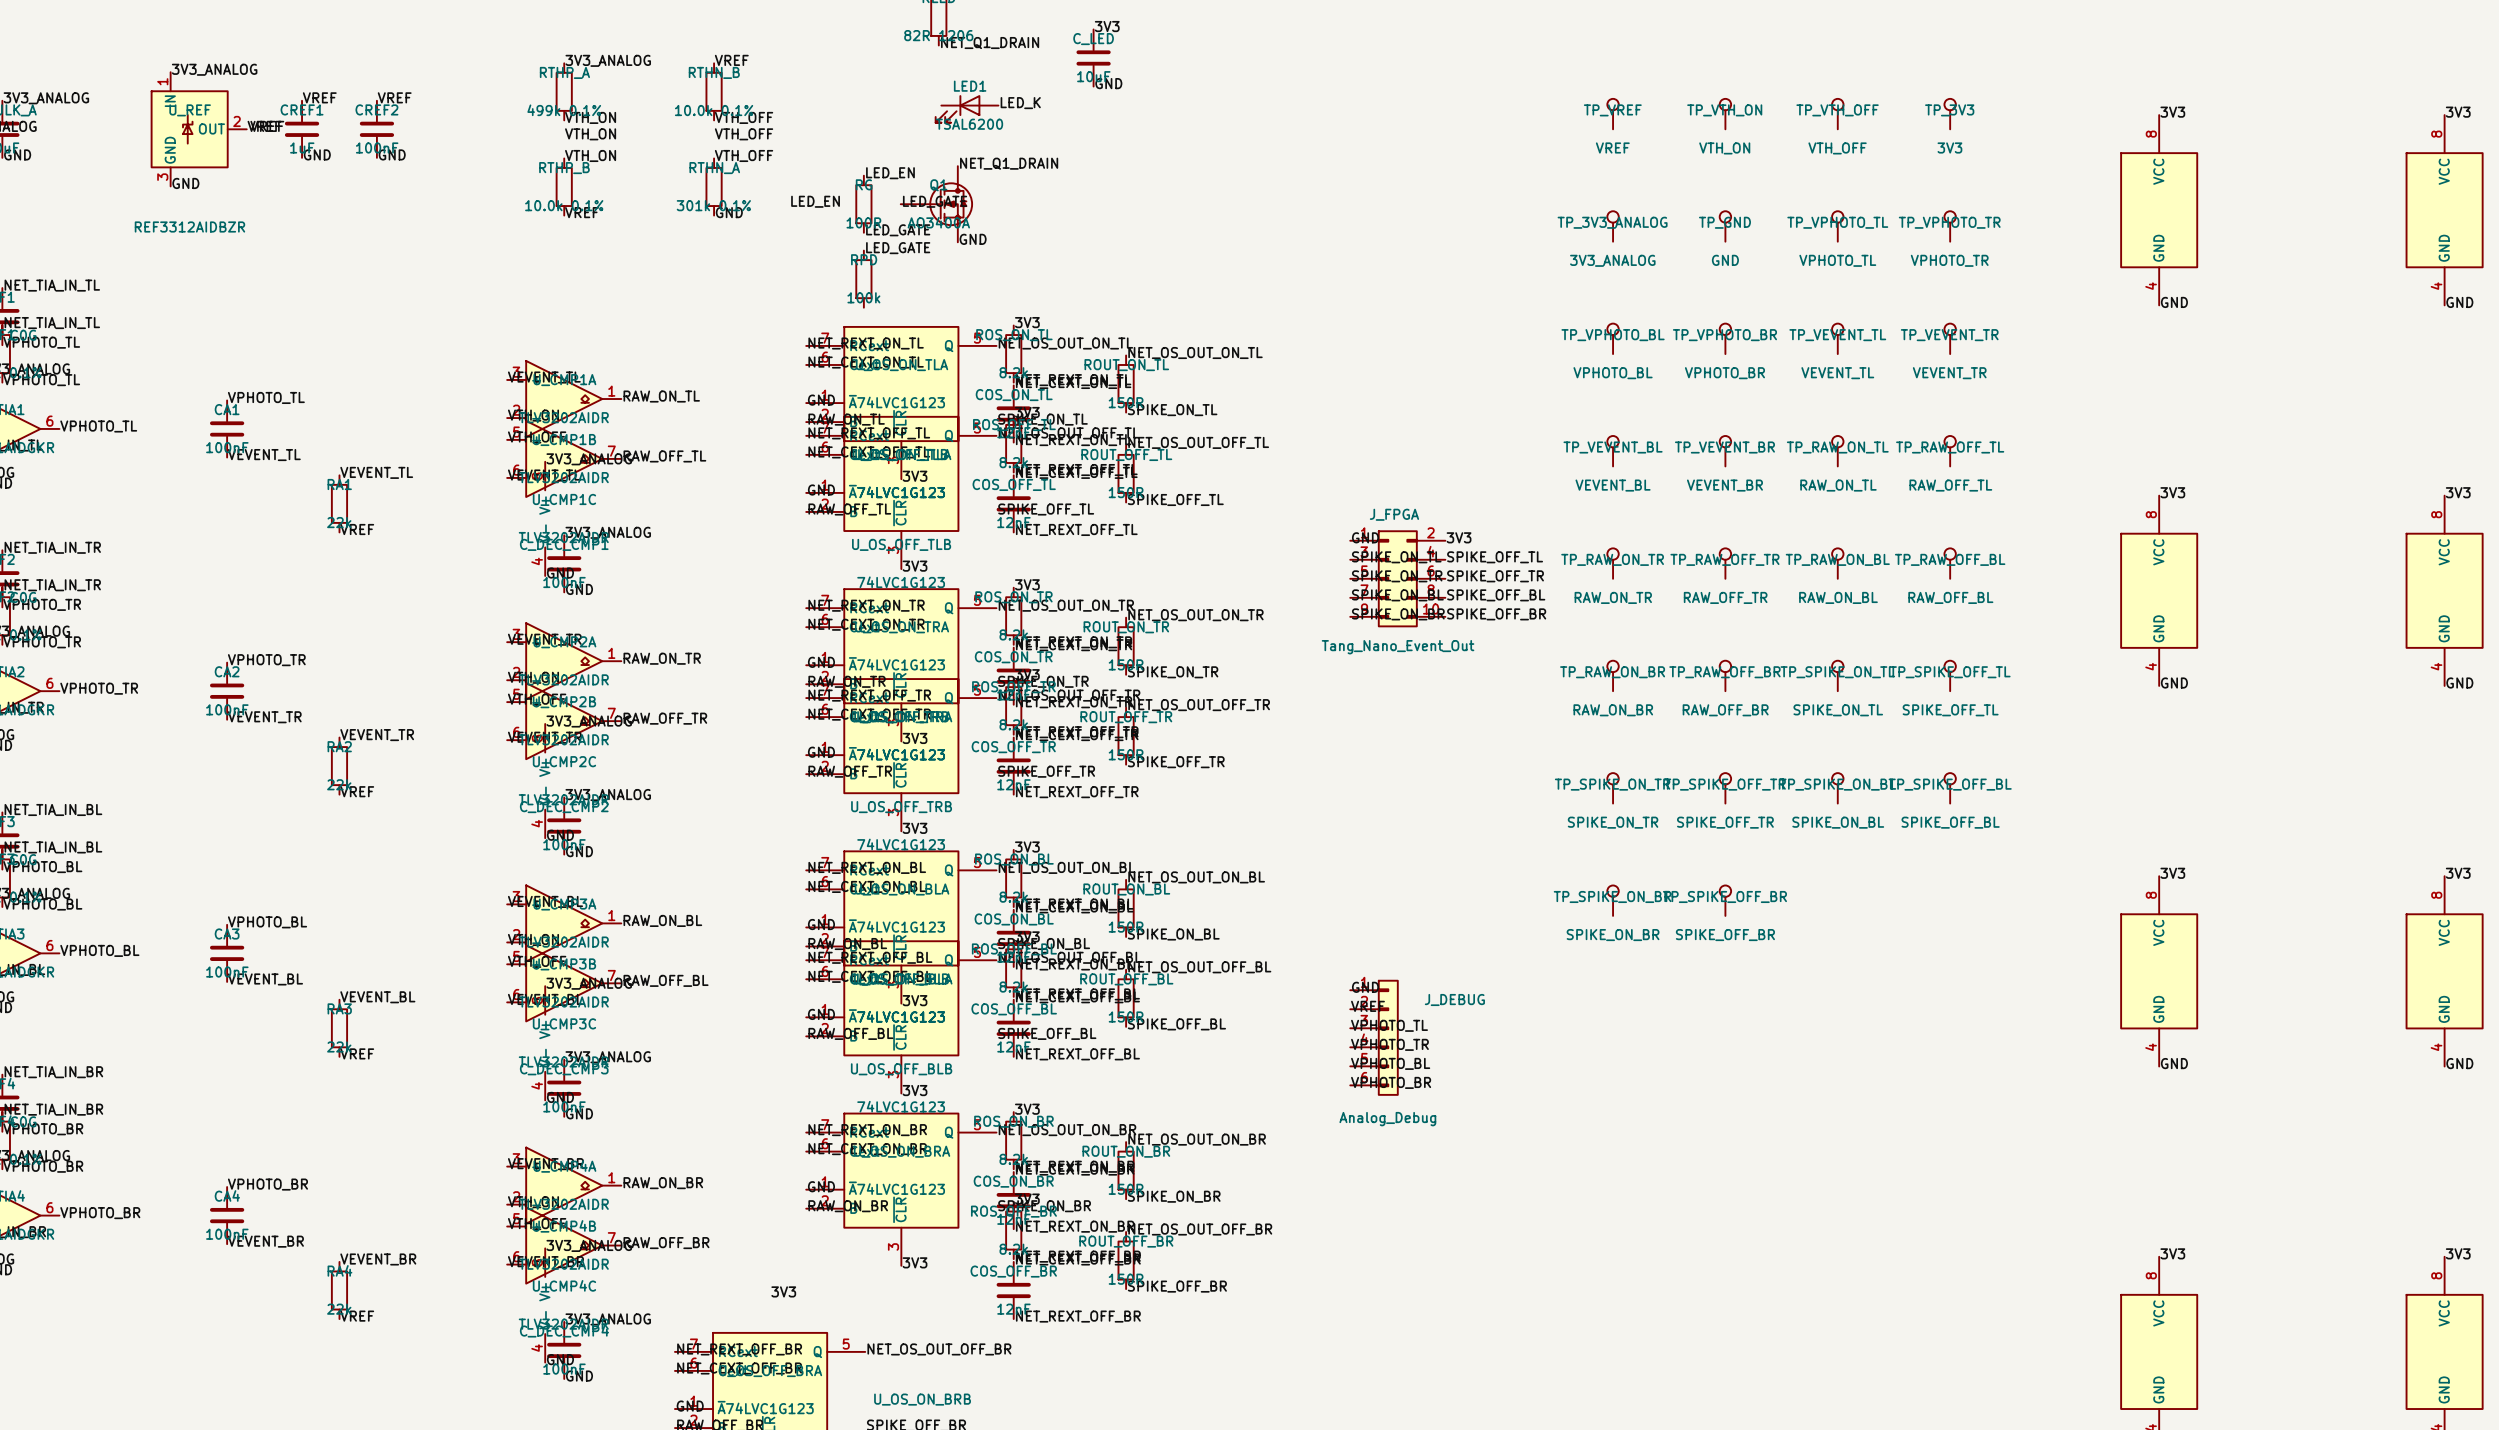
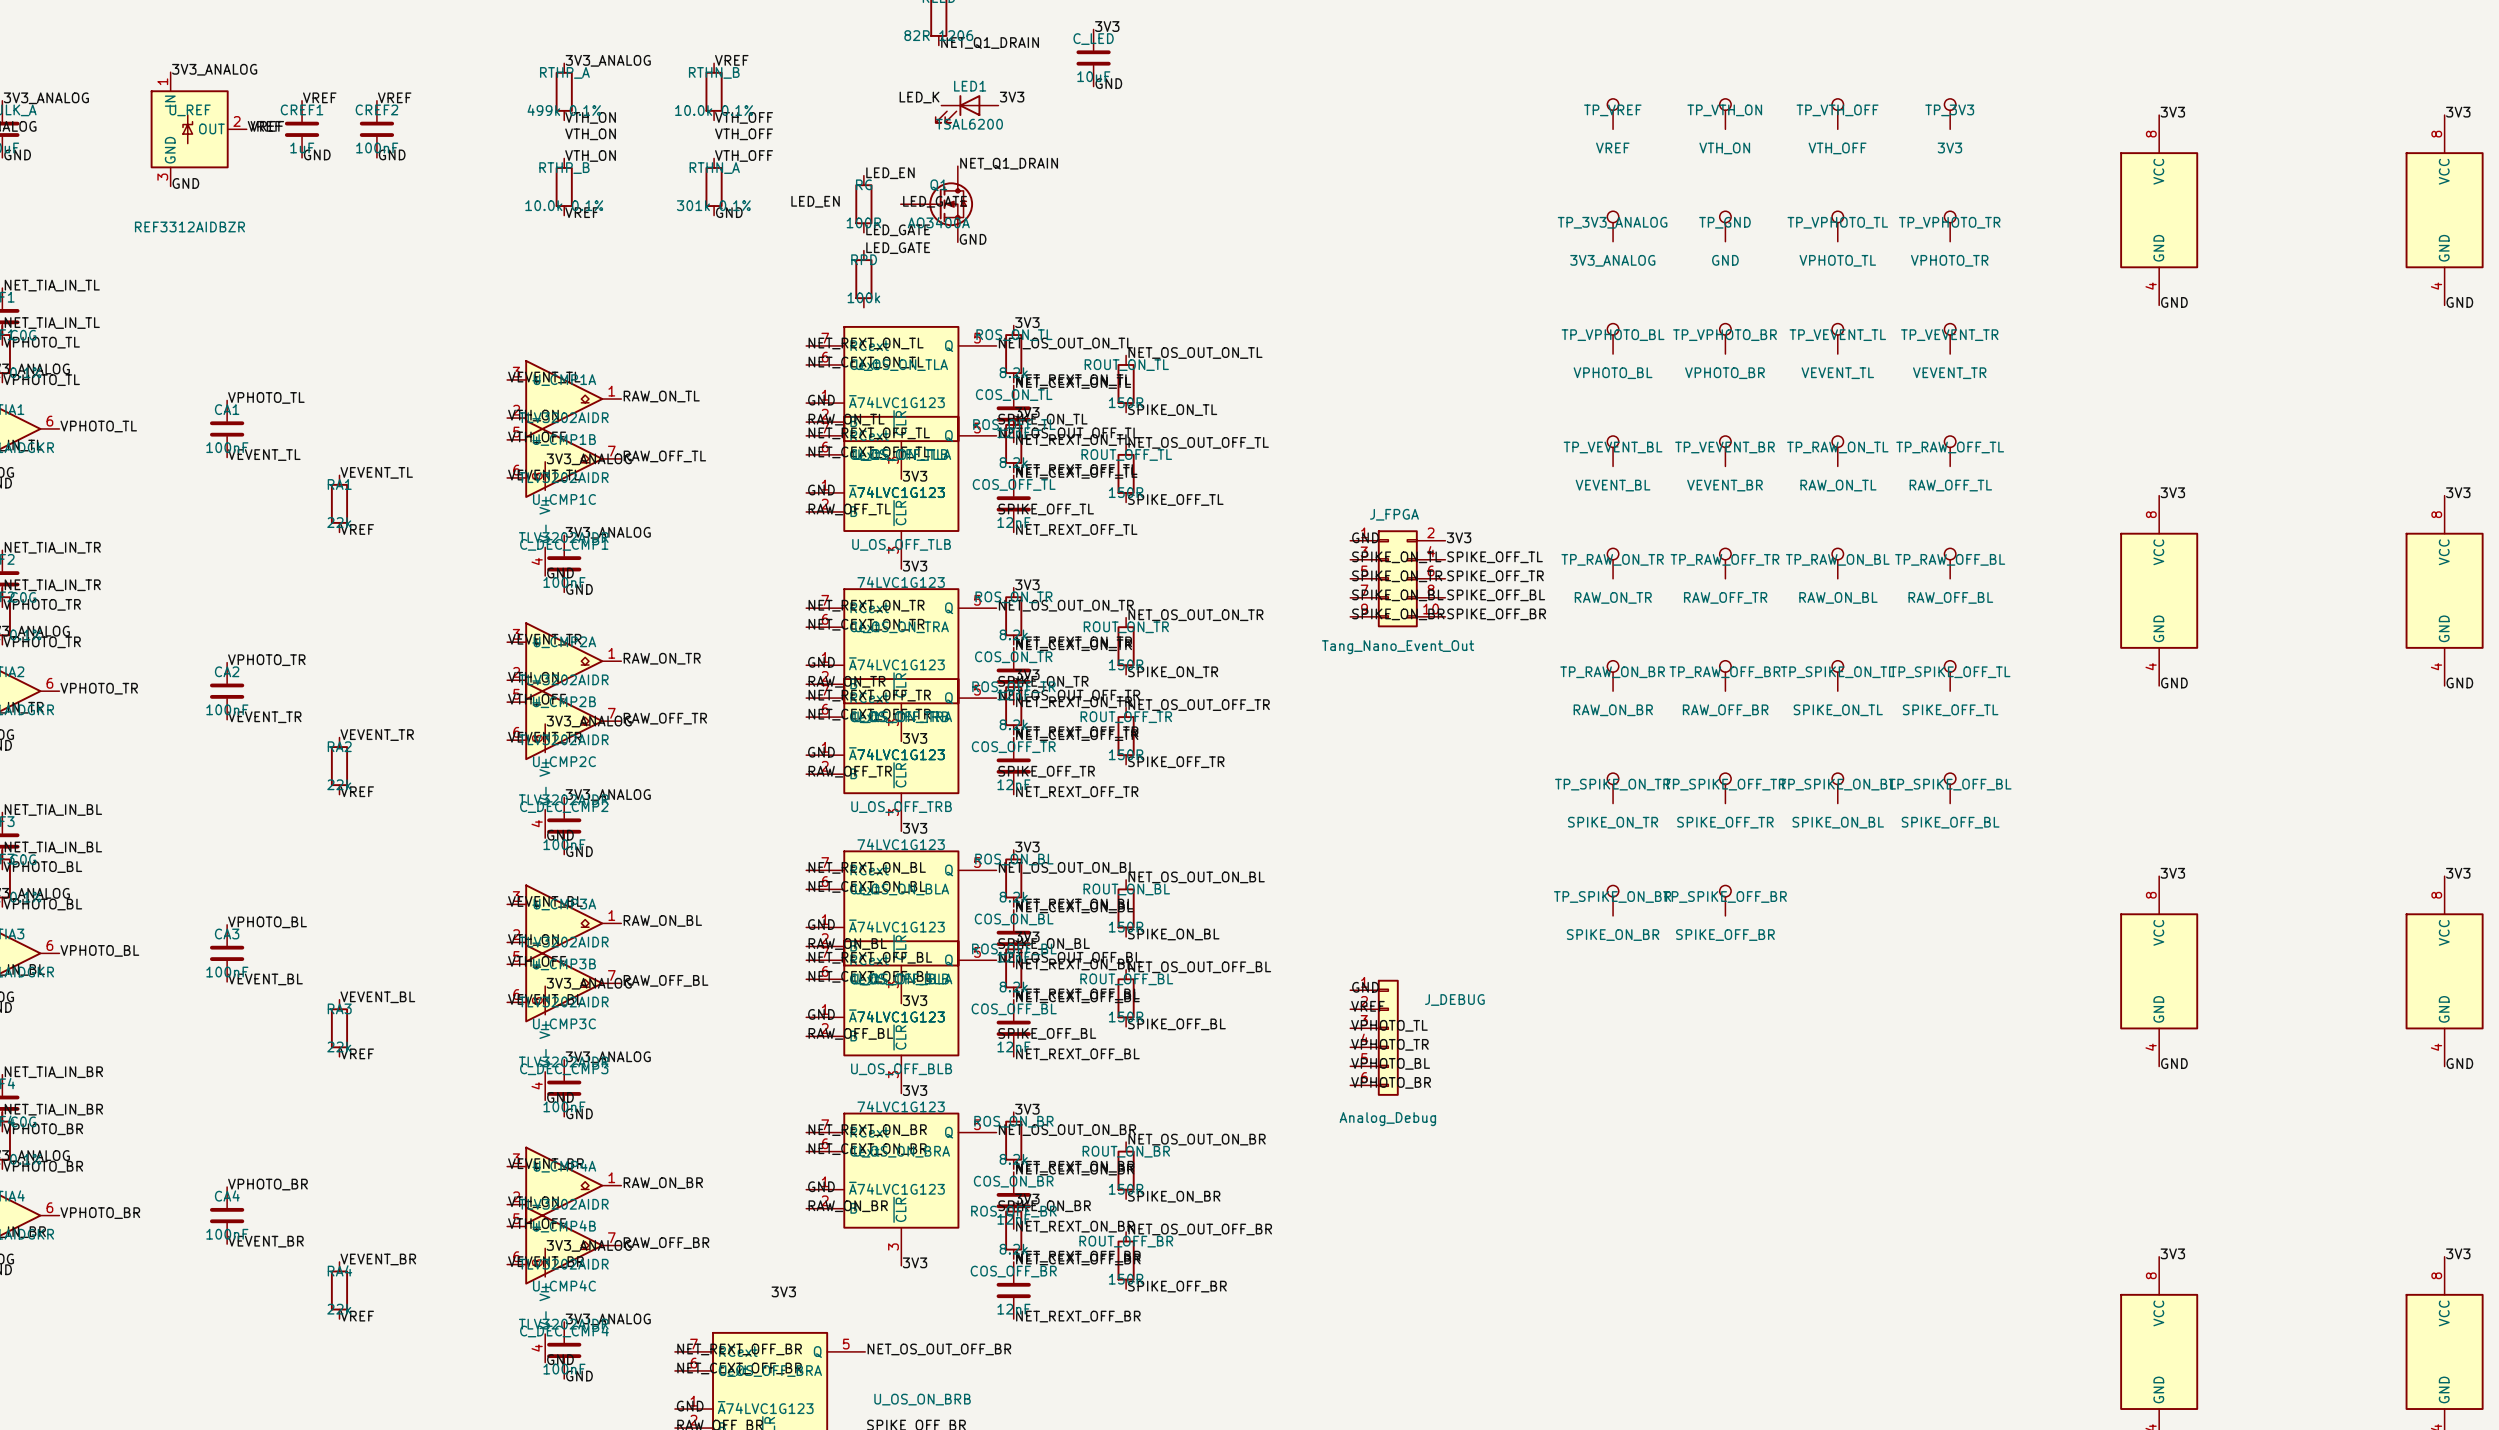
label: none -> LED_K (919, 97)
label: LED_K (1020, 103) -> 3V3 (1012, 97)

